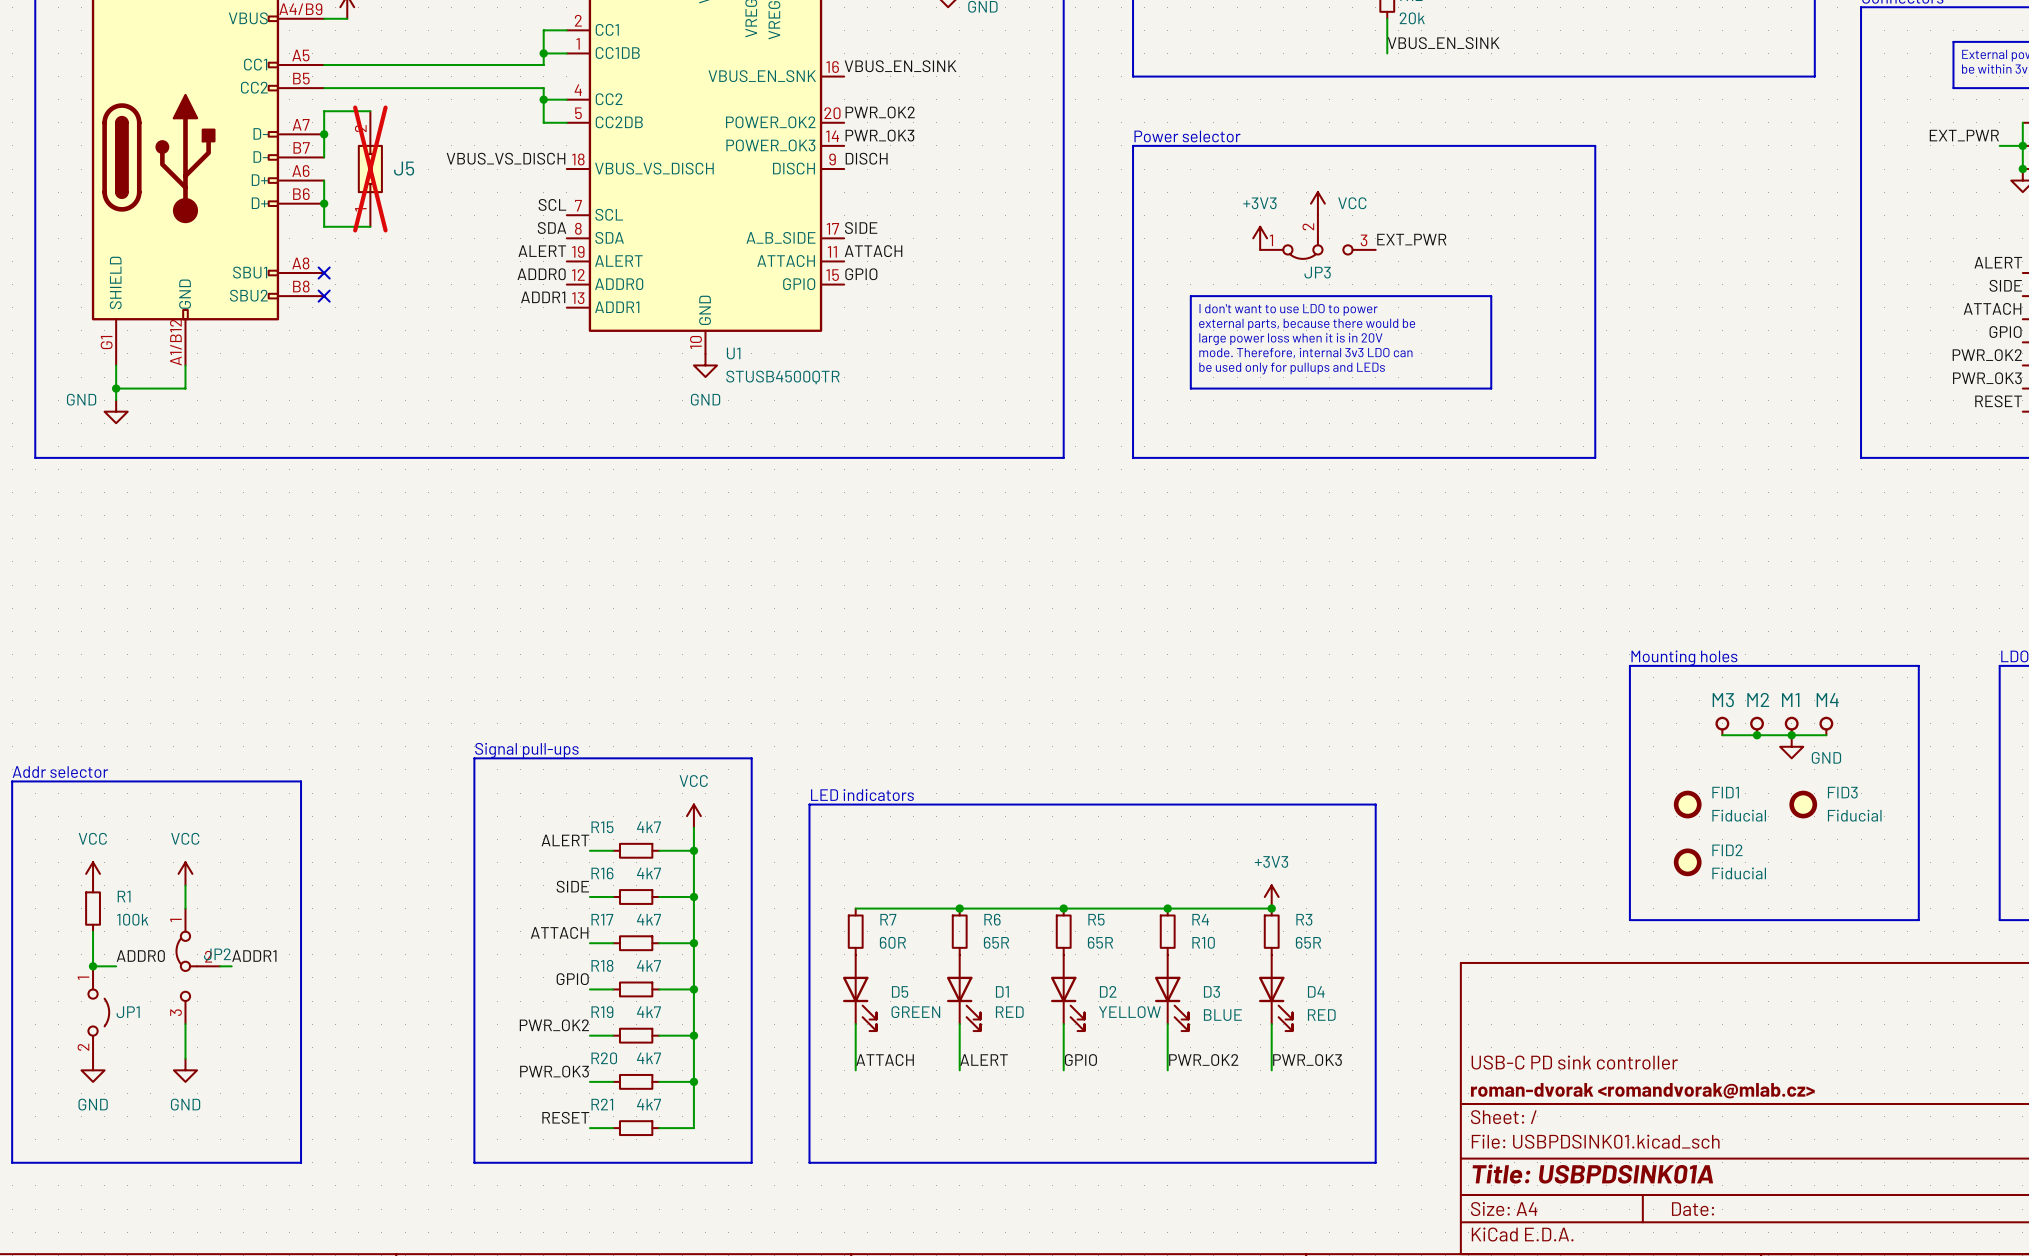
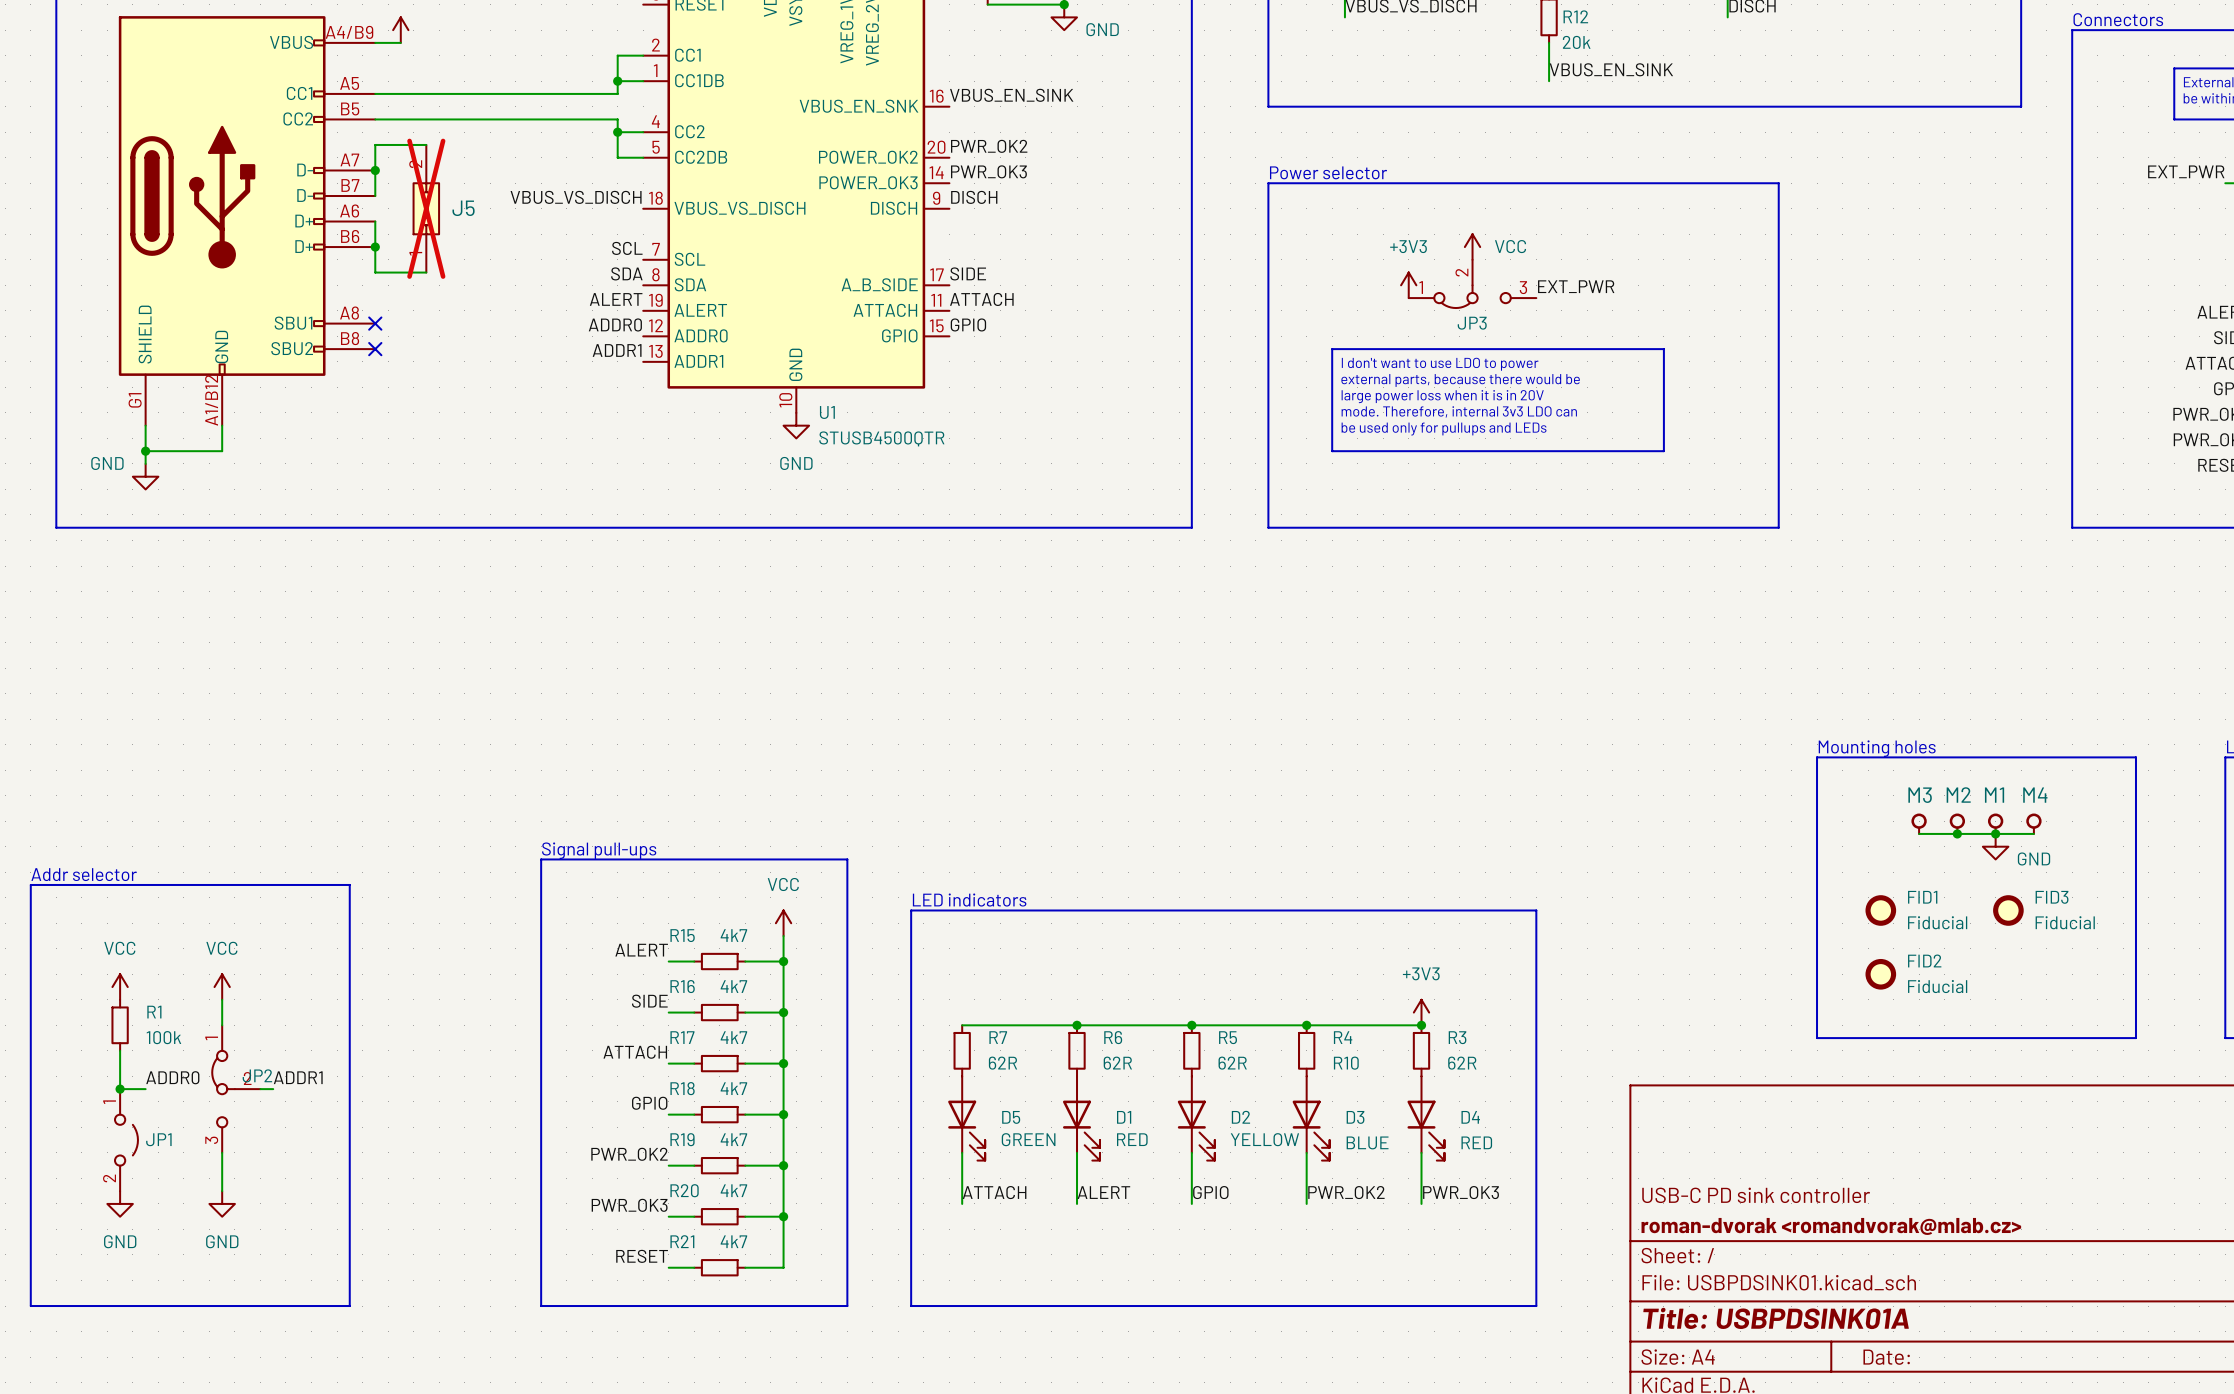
R7 value: 60R (892, 942) -> 62R (1003, 1063)
R6 value: 65R (996, 942) -> 62R (1117, 1063)
R5 value: 65R (1100, 942) -> 62R (1232, 1063)
R3 value: 65R (1308, 942) -> 62R (1462, 1063)

